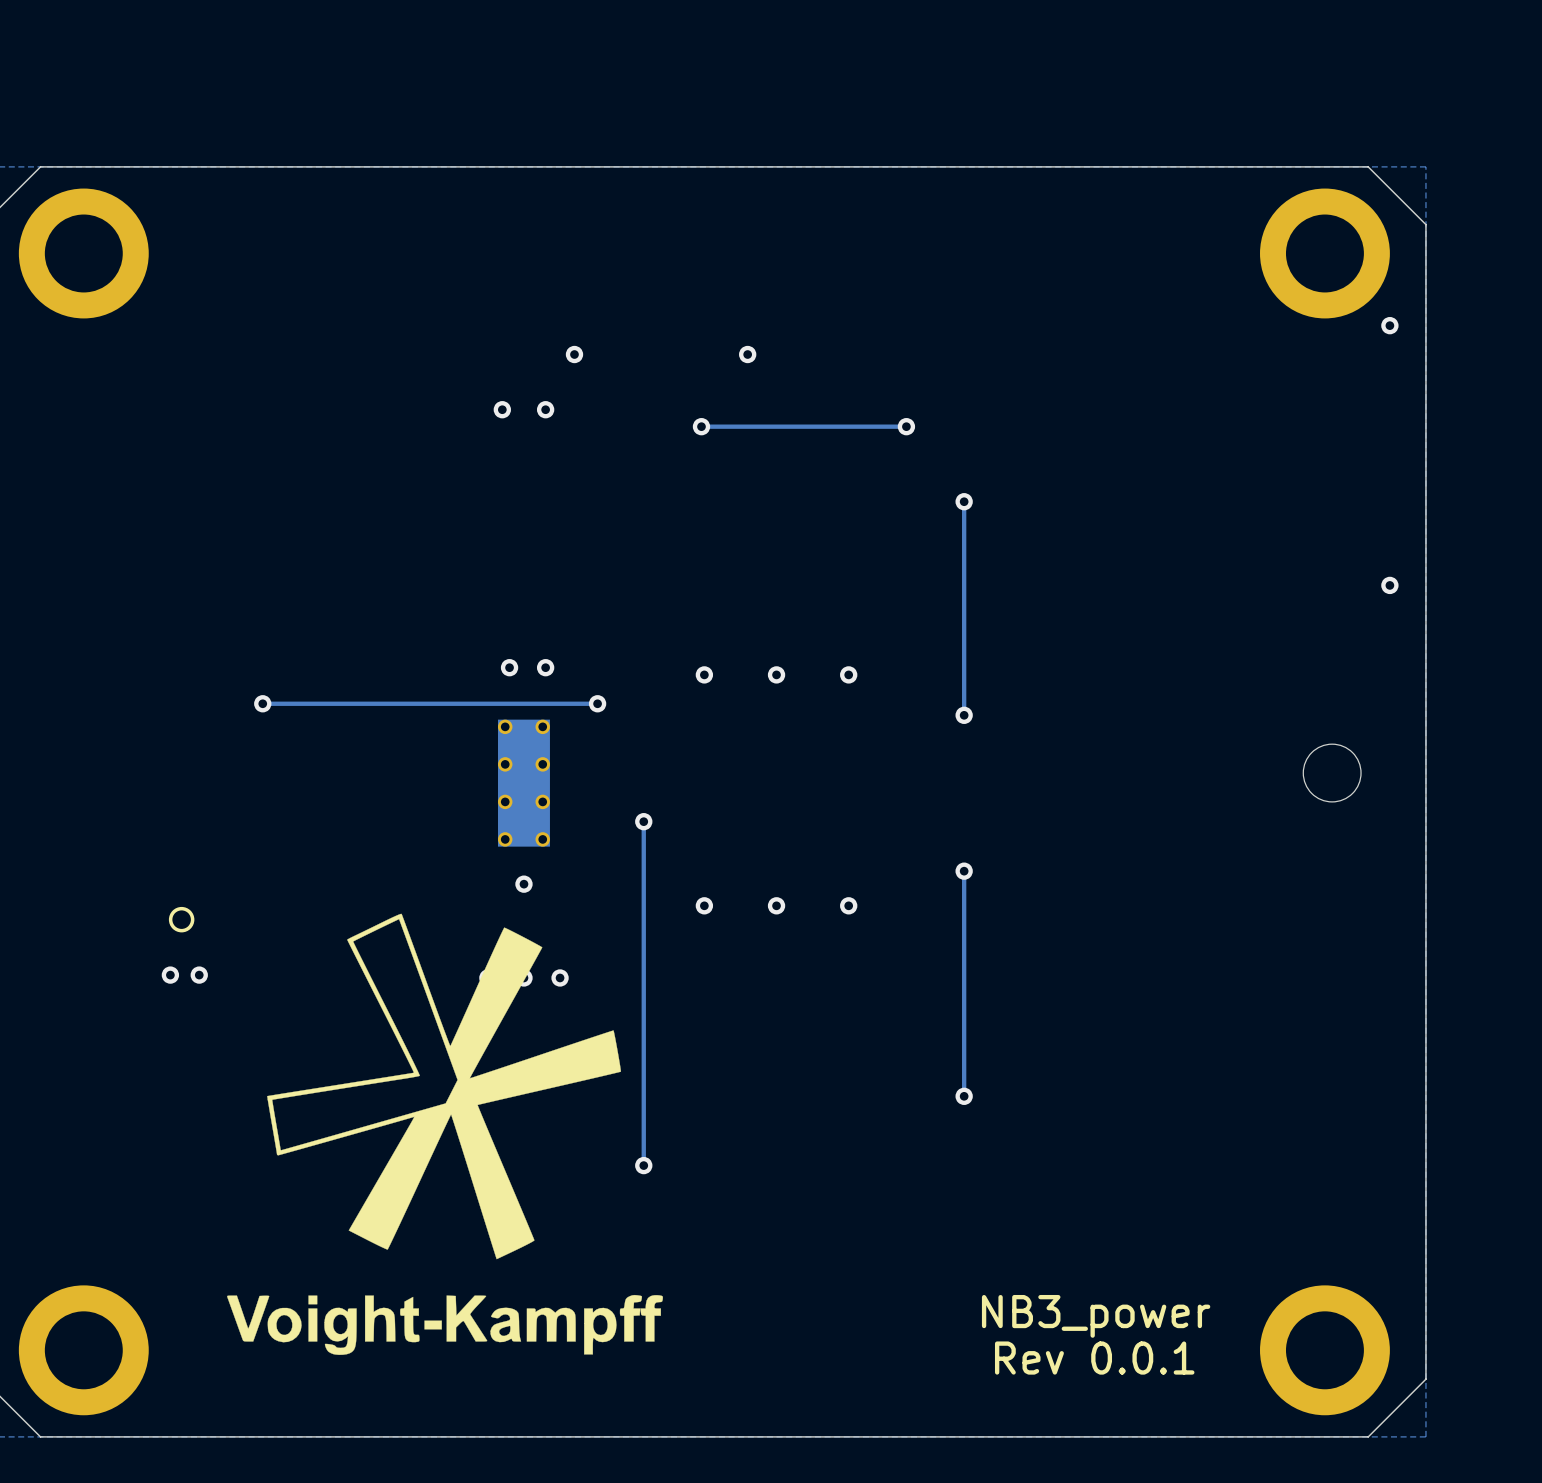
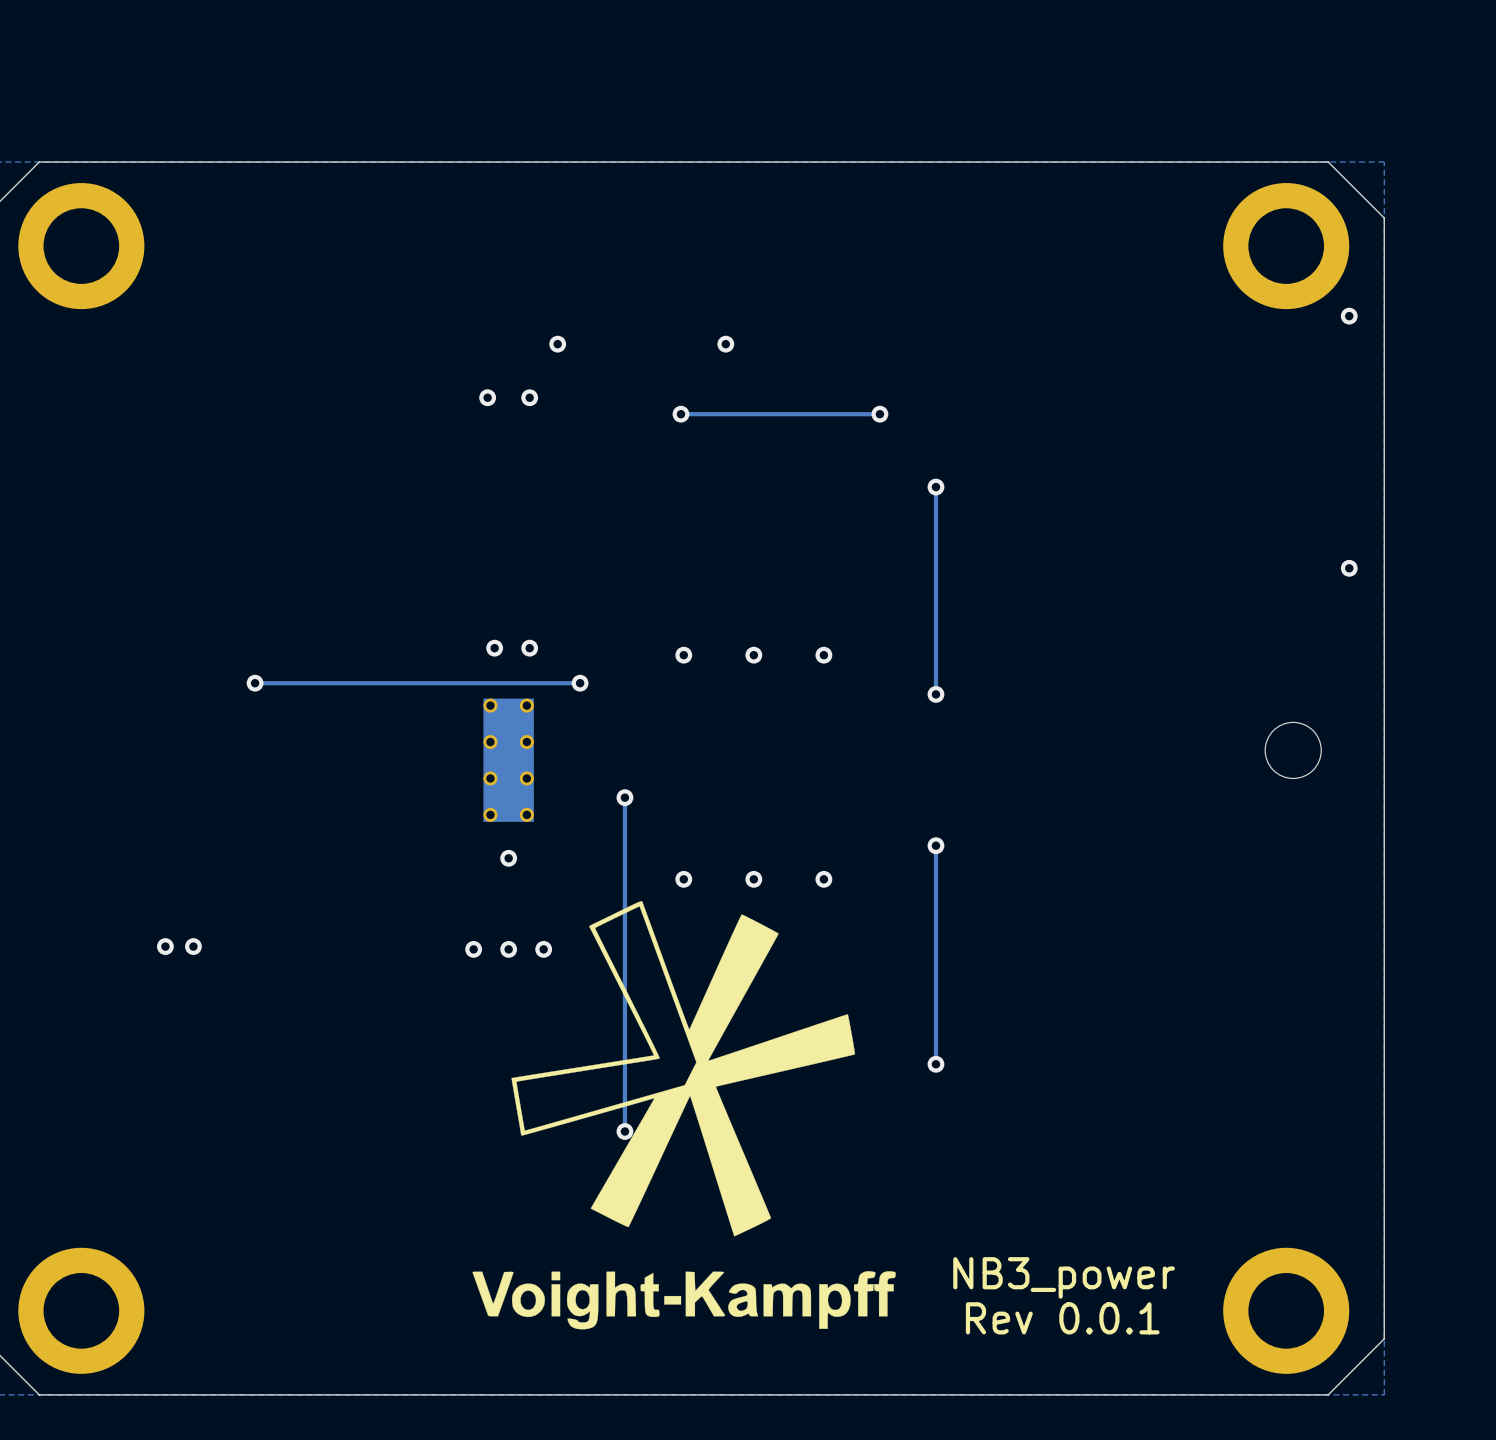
part: (181, 919) -> none
drawing position: (445, 1134) -> (684, 1115)

